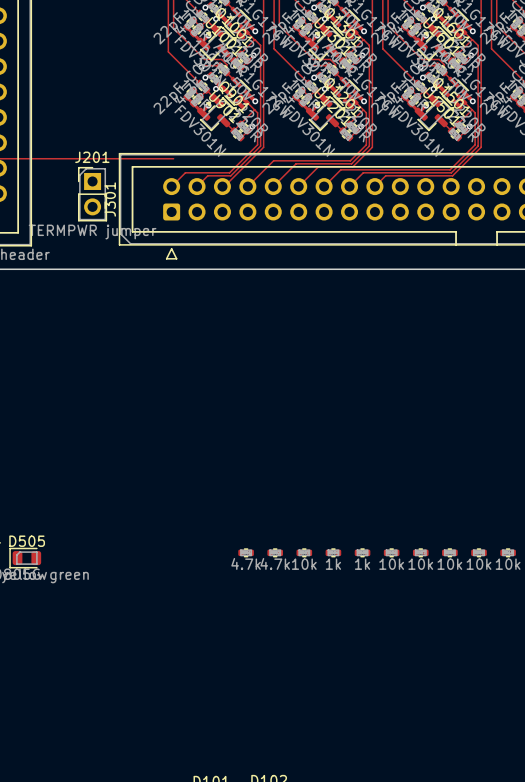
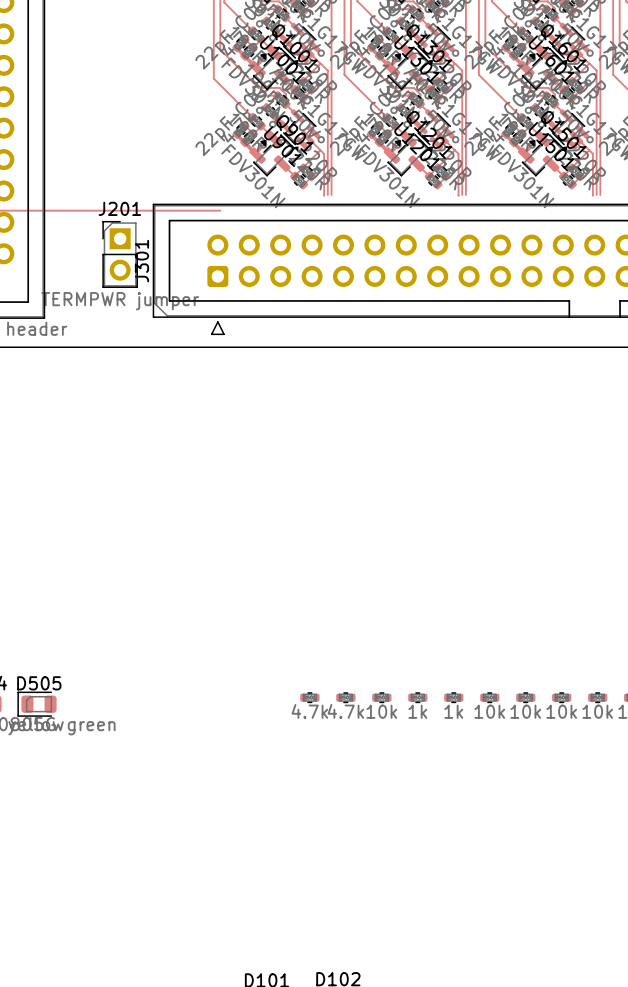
track: (257, 144) (229, 172) (185, 172) (171, 186) -> (324, 193) (324, 195)
track: (366, 144) (350, 160) (273, 160) (247, 186) -> (458, 193) (458, 195)
track: (475, 144) (450, 169) (340, 169) (324, 186) -> (592, 193) (592, 195)
track: (260, 146) (230, 175) (207, 175) (197, 186) -> none
track: (263, 146) (222, 186) -> none
track: (369, 146) (351, 163) (296, 163) (273, 186) -> none
track: (372, 146) (352, 166) (318, 166) (298, 186) -> none
track: (478, 146) (451, 172) (363, 172) (349, 186) -> none
track: (481, 146) (452, 175) (385, 175) (374, 186) -> none

